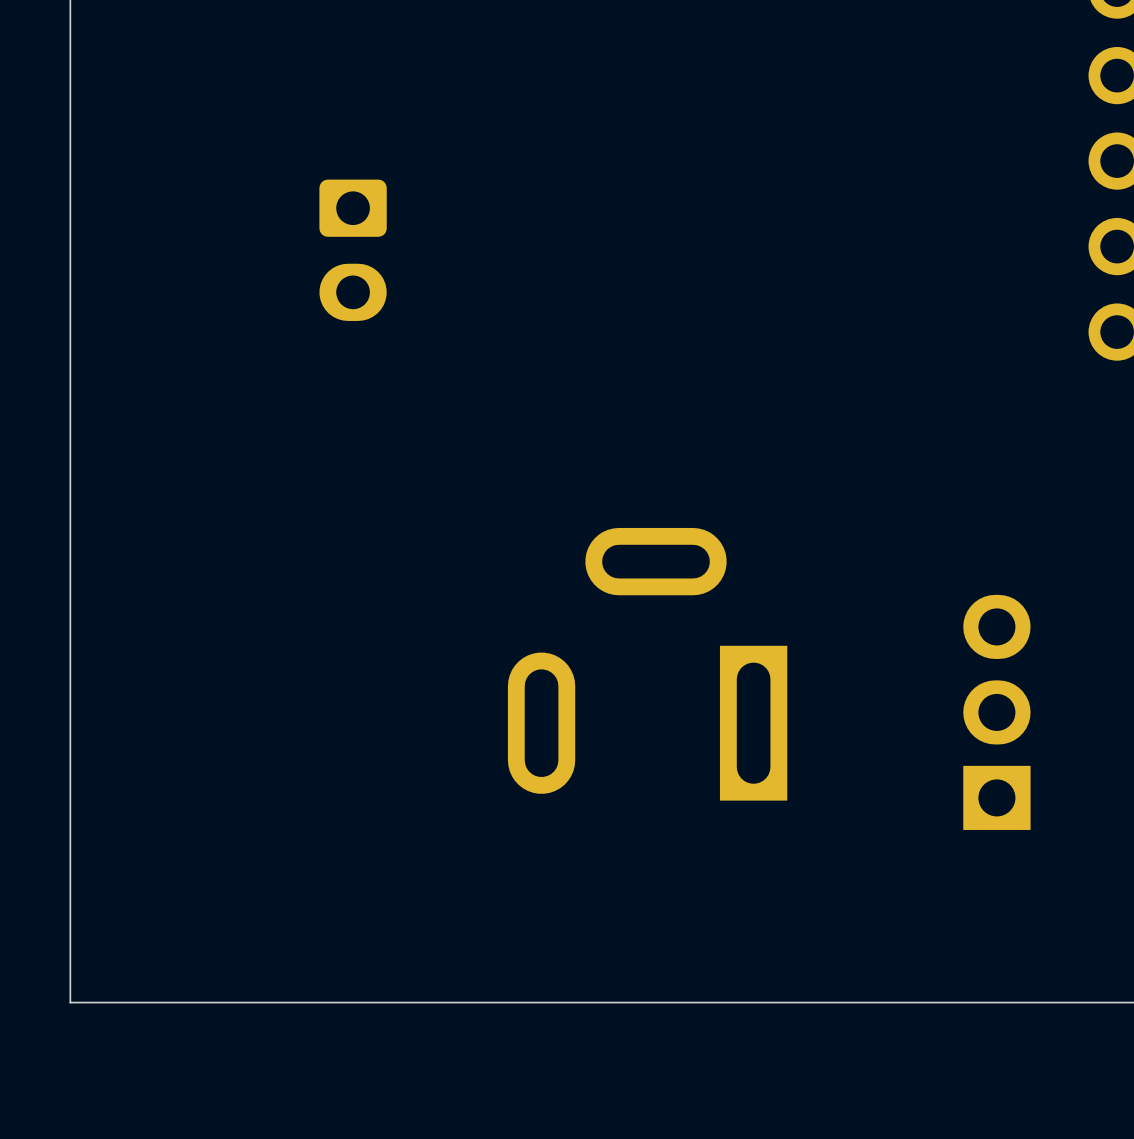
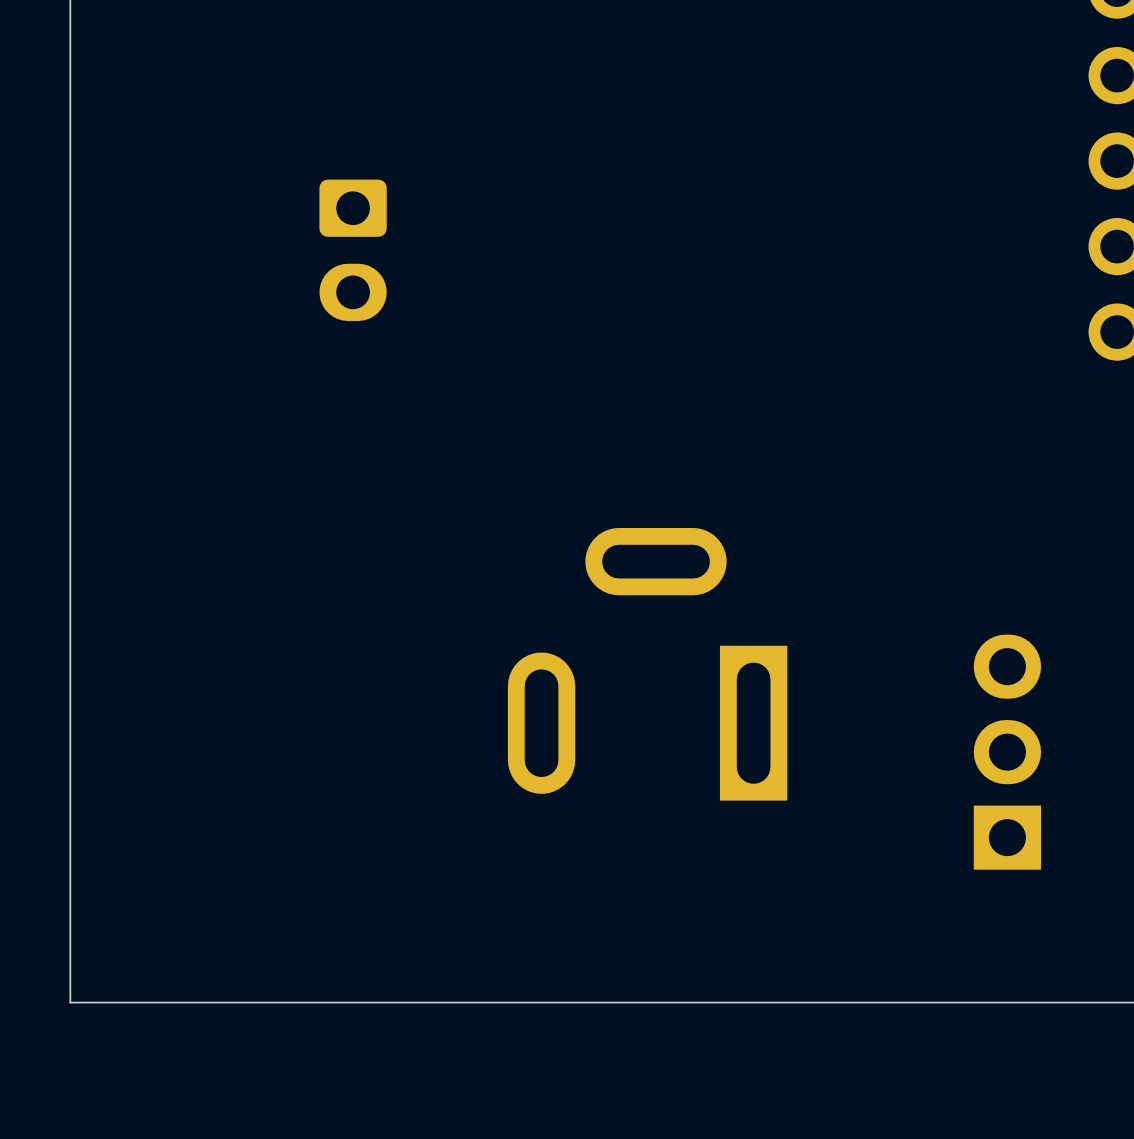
part position: (996, 712) -> (1007, 752)

